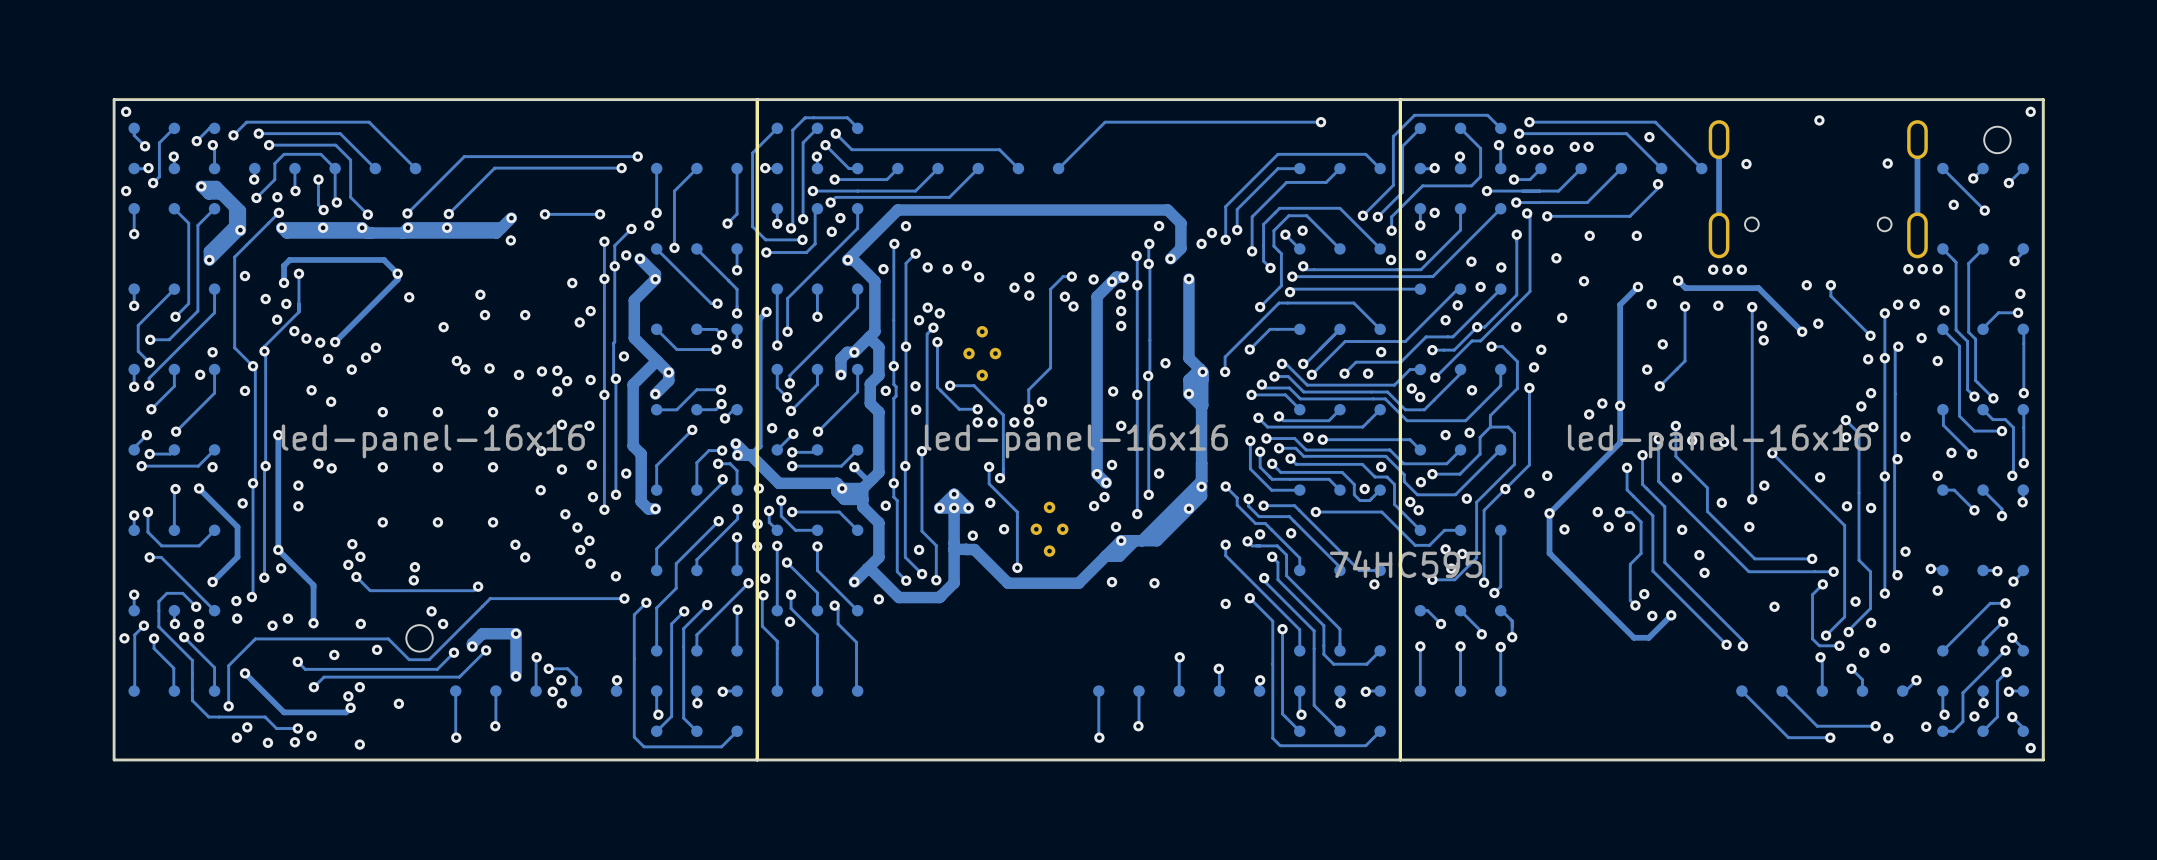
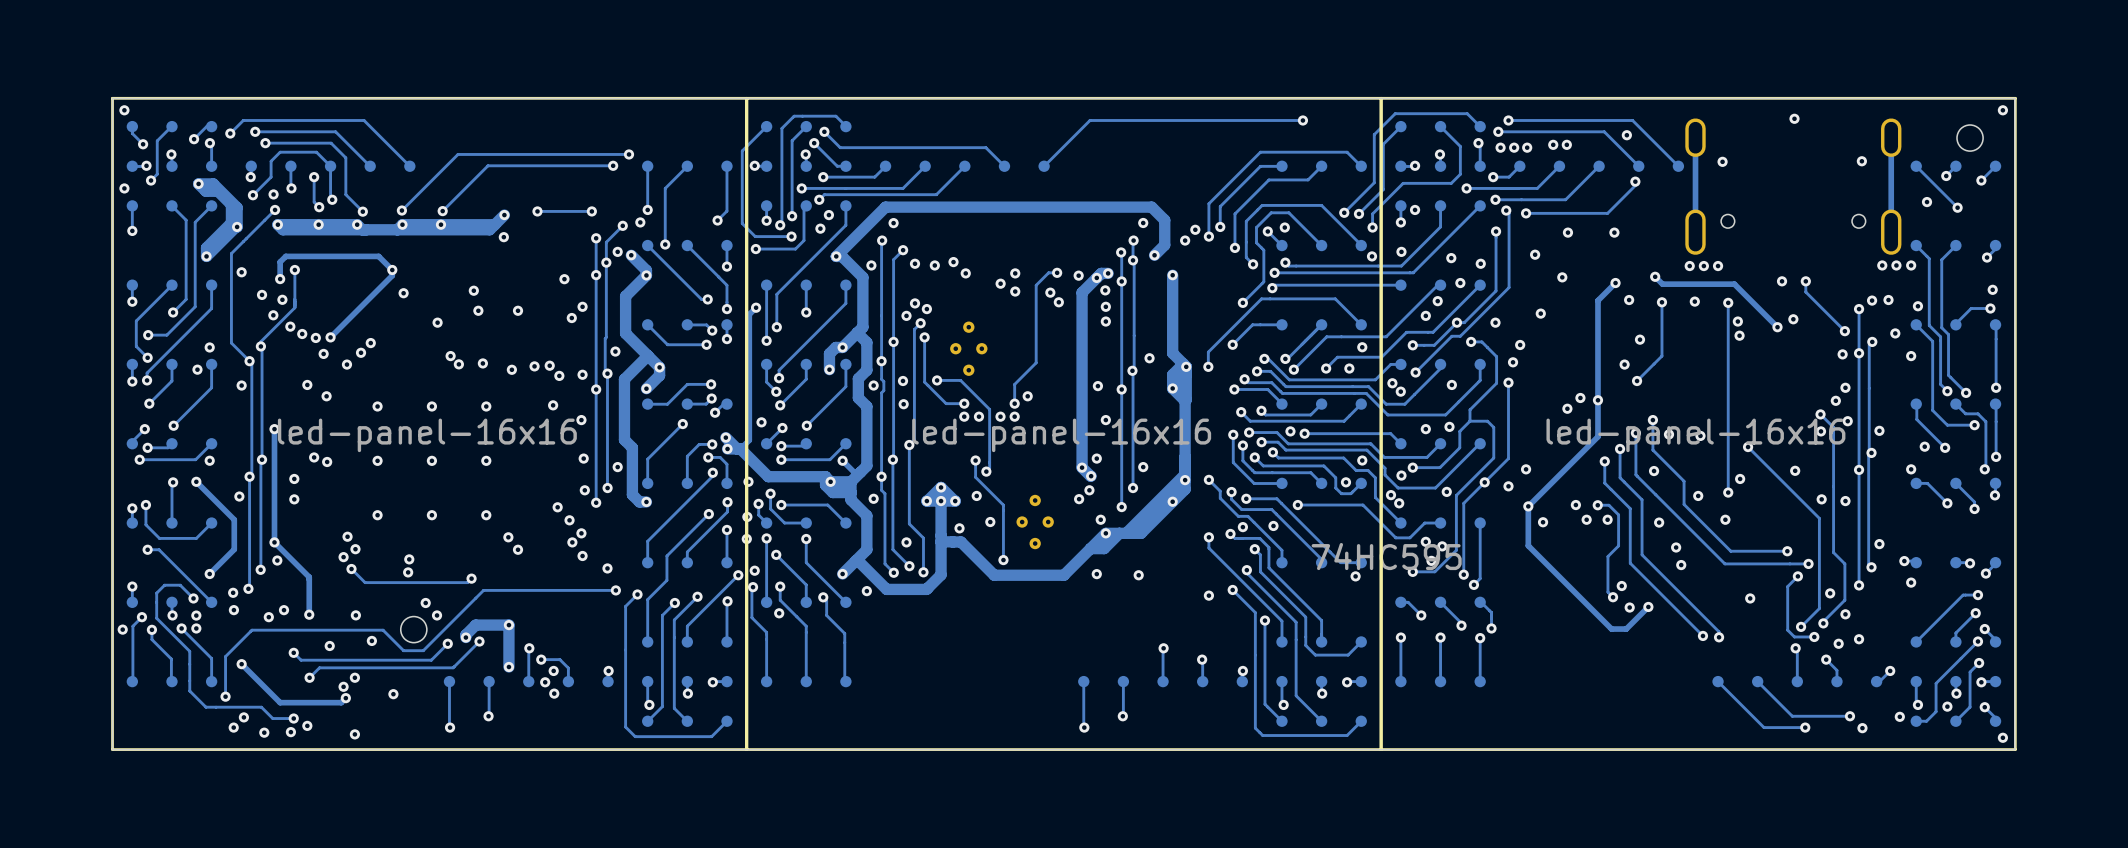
via: (557, 391) -> none
via: none -> (553, 405)
via: (561, 424) -> none
via: (541, 451) -> none
via: (561, 469) -> none
via: (540, 490) -> none

